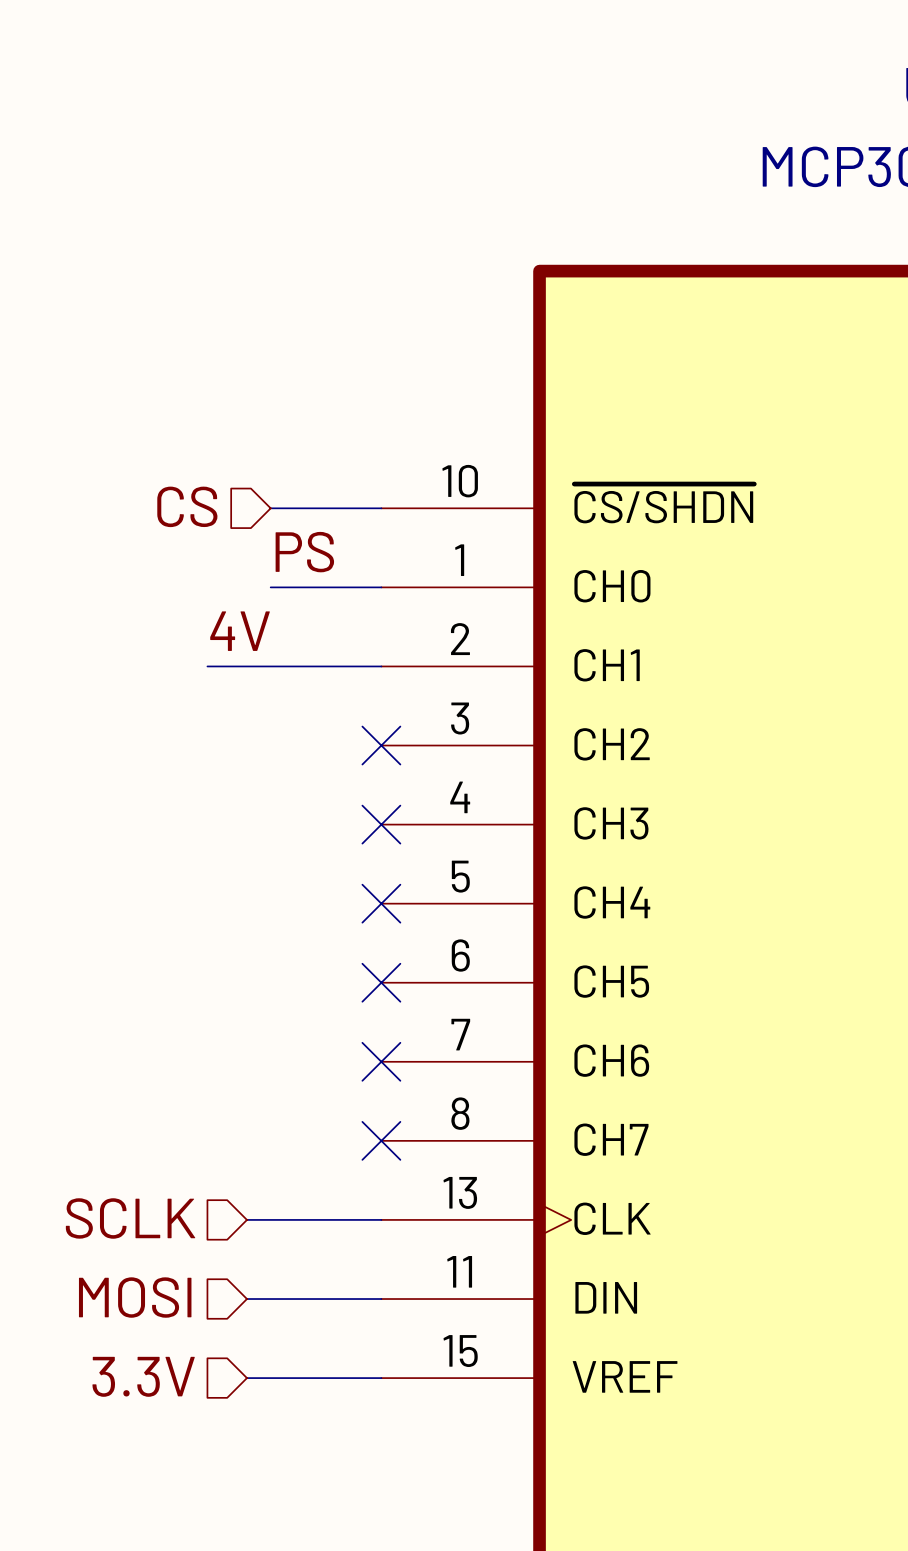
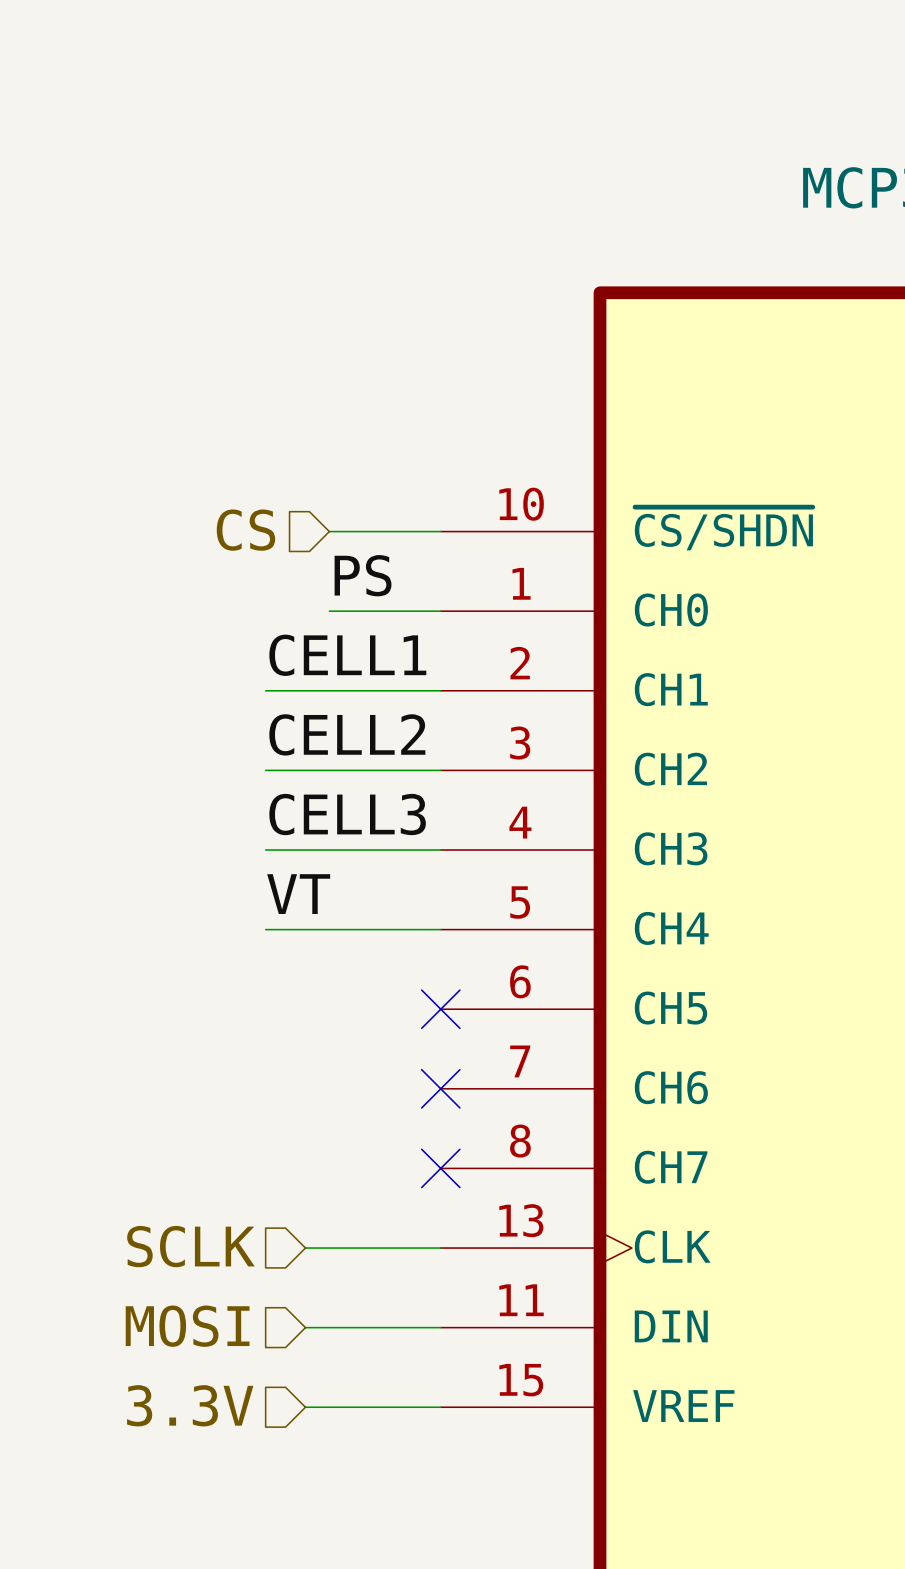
label: 4V (240, 631) -> CELL1 (347, 655)
label: none -> CELL2 (347, 734)
wire: none -> (265, 770) (440, 770)
no-connect mark: (381, 745) -> none
label: none -> CELL3 (347, 814)
wire: none -> (265, 850) (440, 850)
no-connect mark: (381, 824) -> none
label: none -> VT (298, 894)
wire: none -> (265, 929) (440, 929)
no-connect mark: (381, 903) -> none

